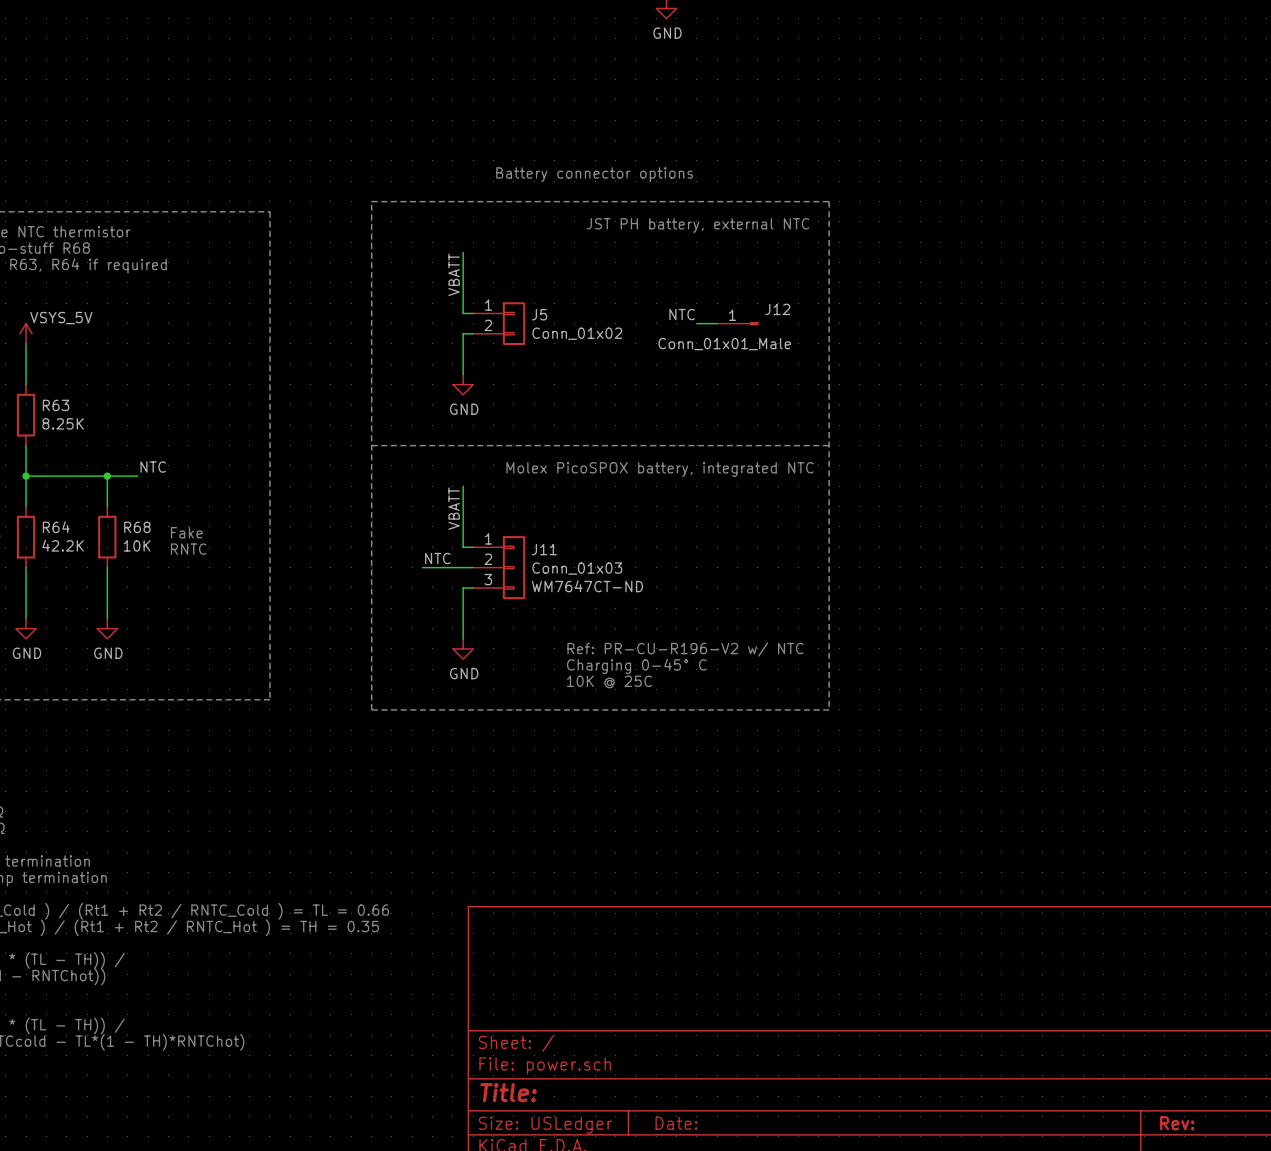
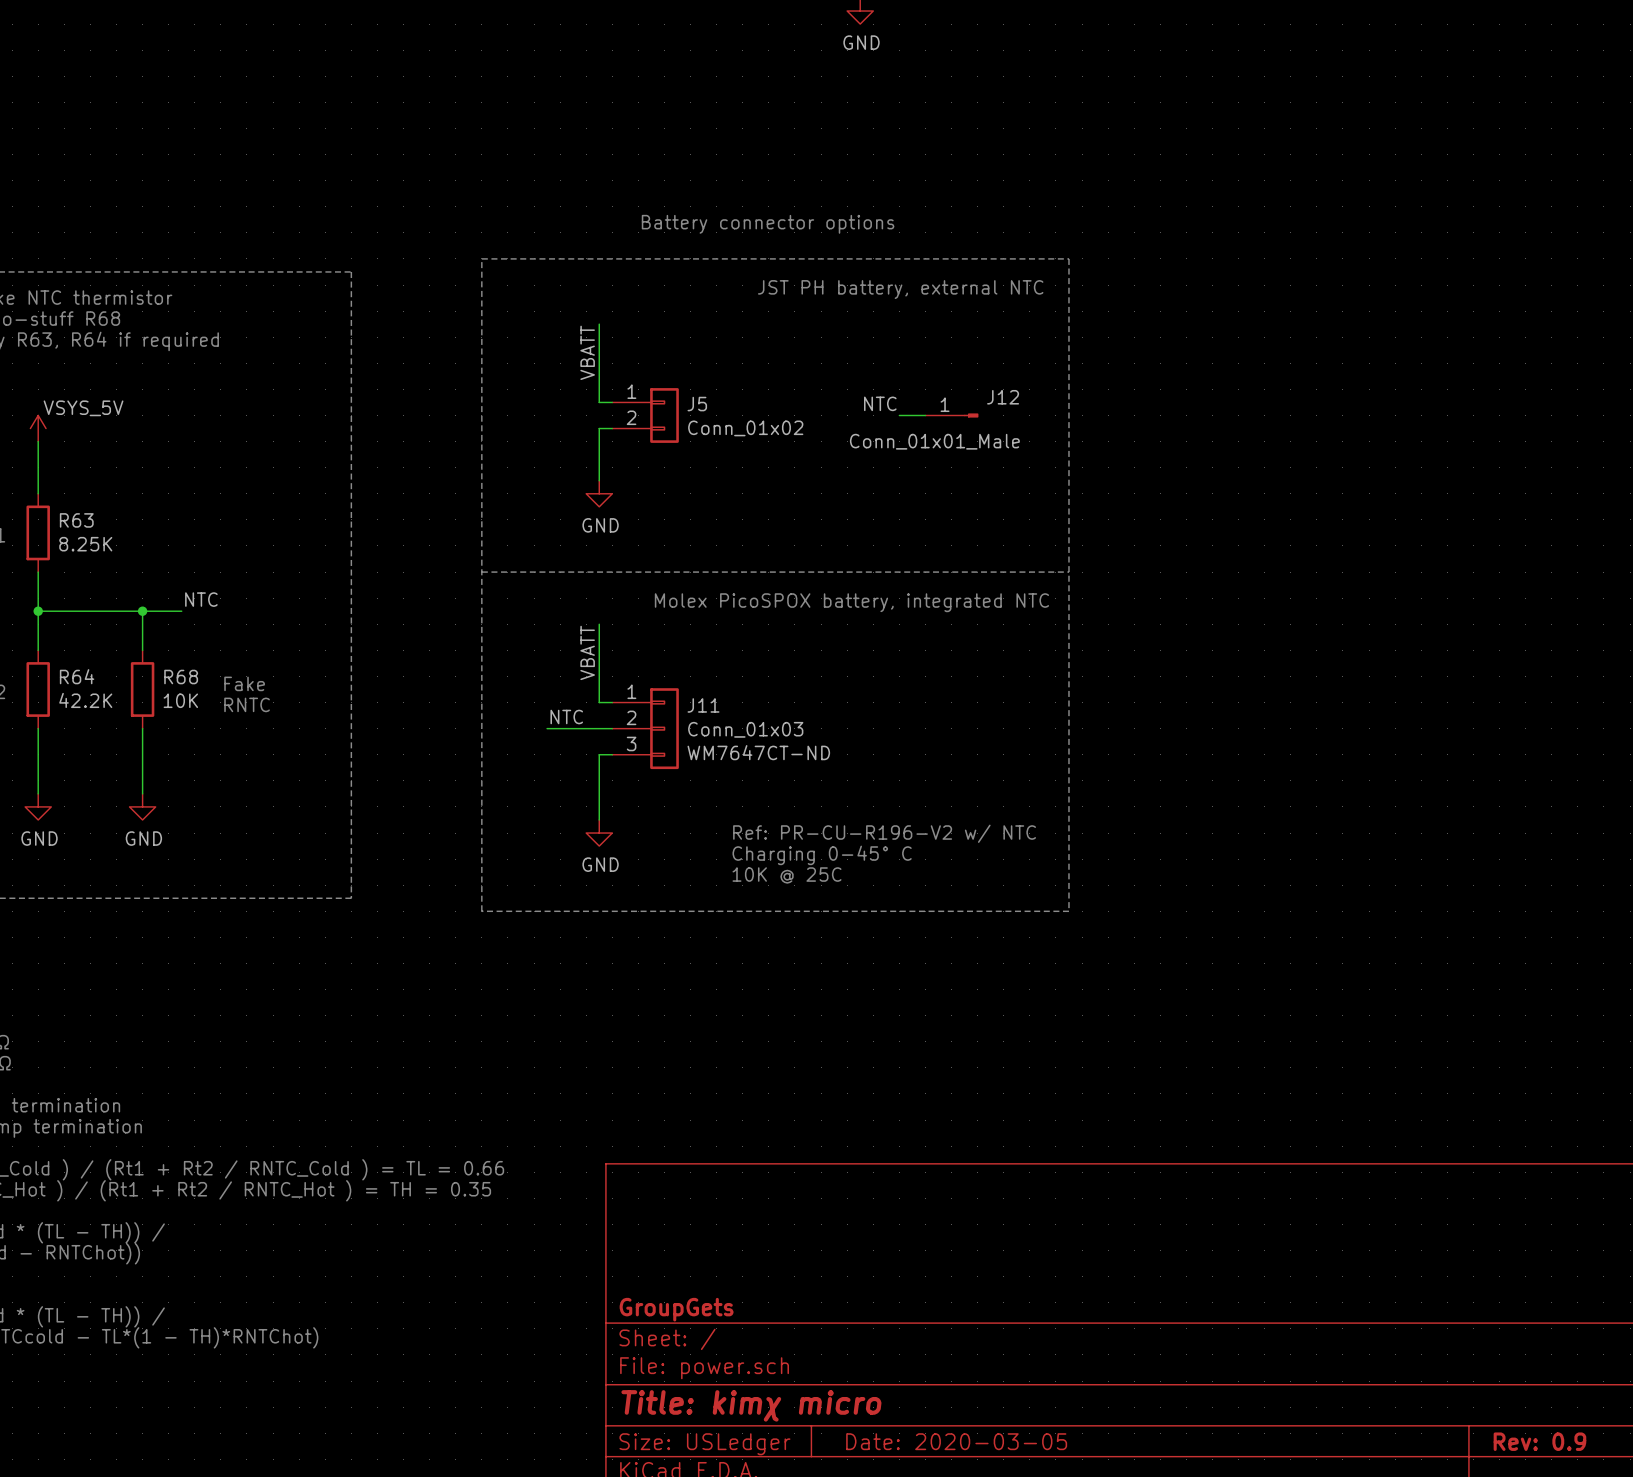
title block: none -> GroupGets (676, 1309)
title block: Title: (508, 1092) -> Title: kimχ micro (751, 1405)
title block: Date: (676, 1123) -> Date: 2020-03-05 (956, 1441)
title block: Rev: (1177, 1123) -> Rev: 0.9 (1539, 1441)

